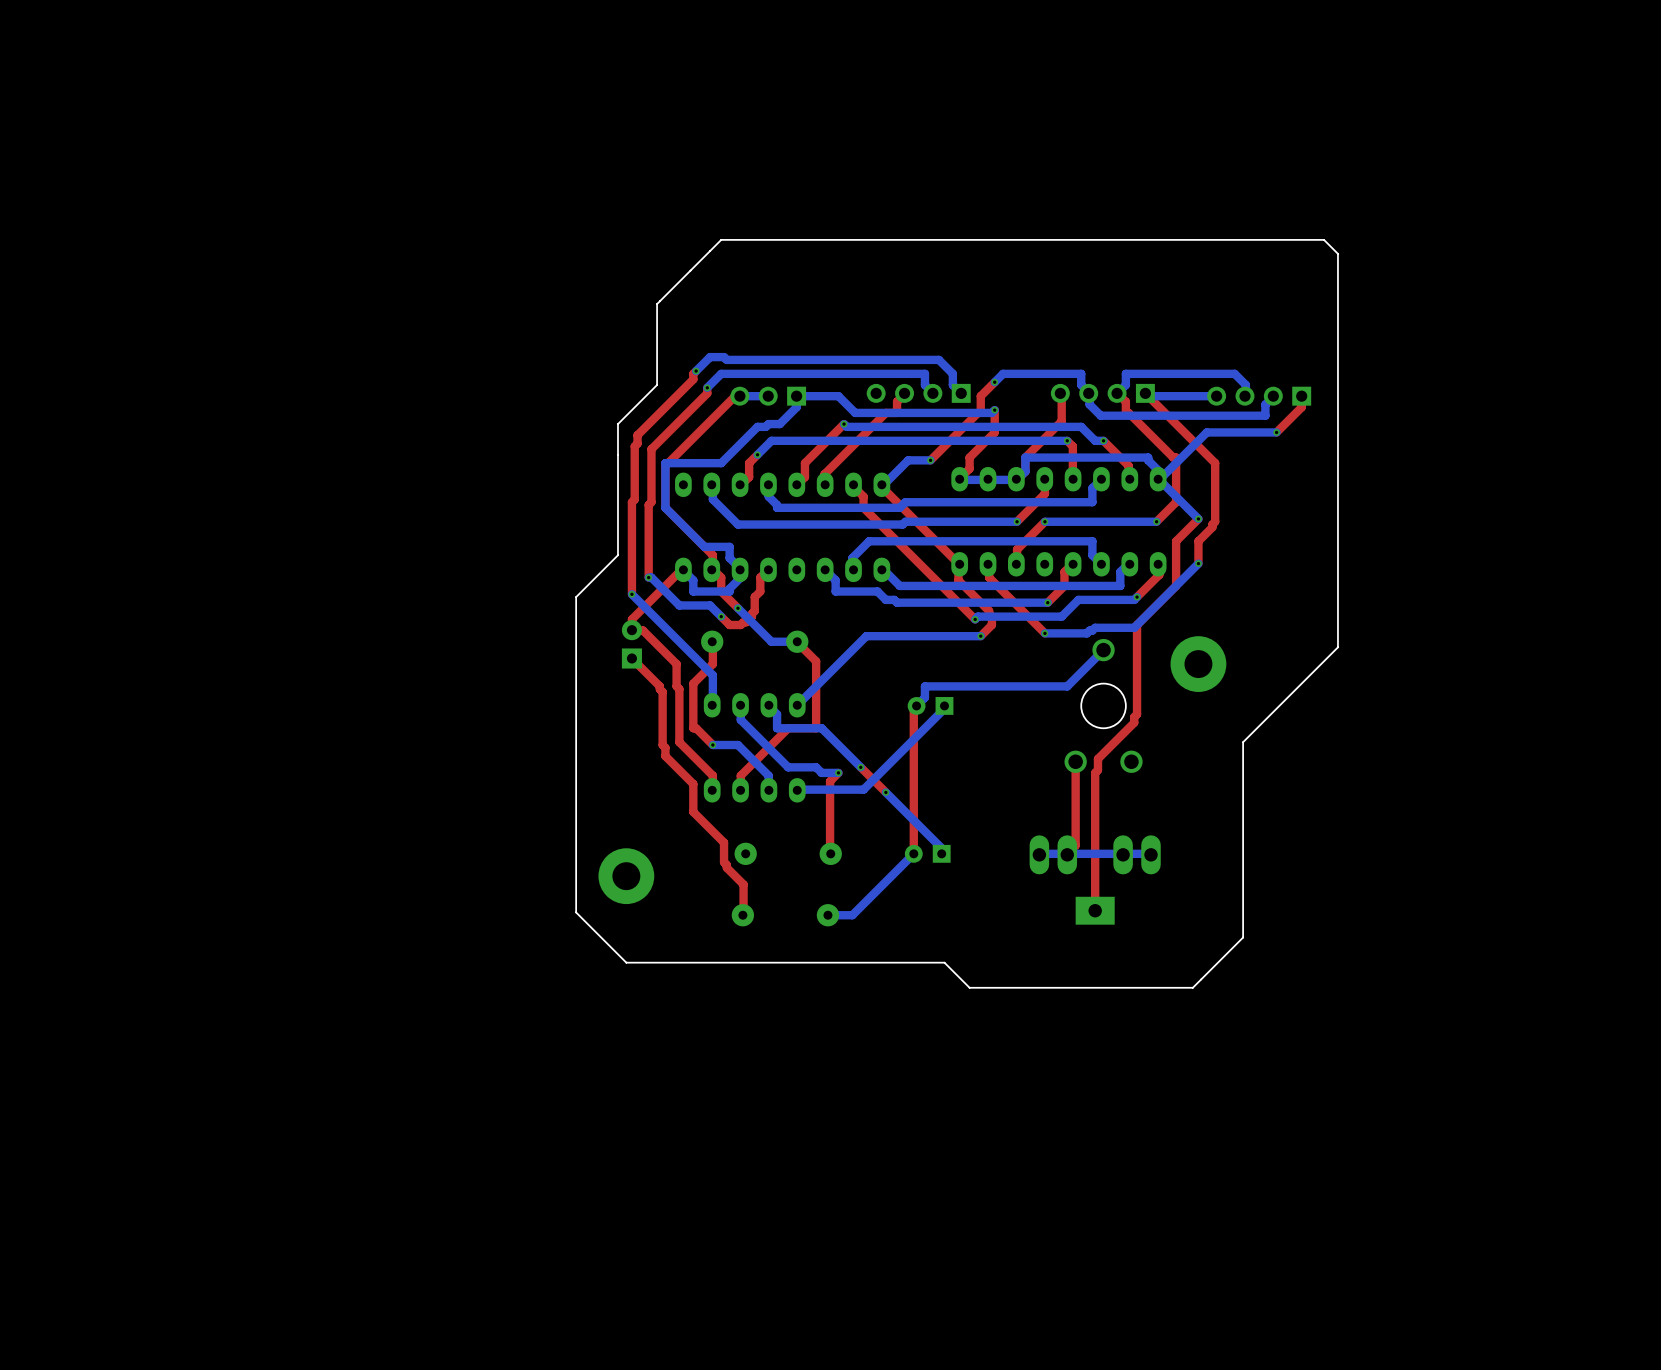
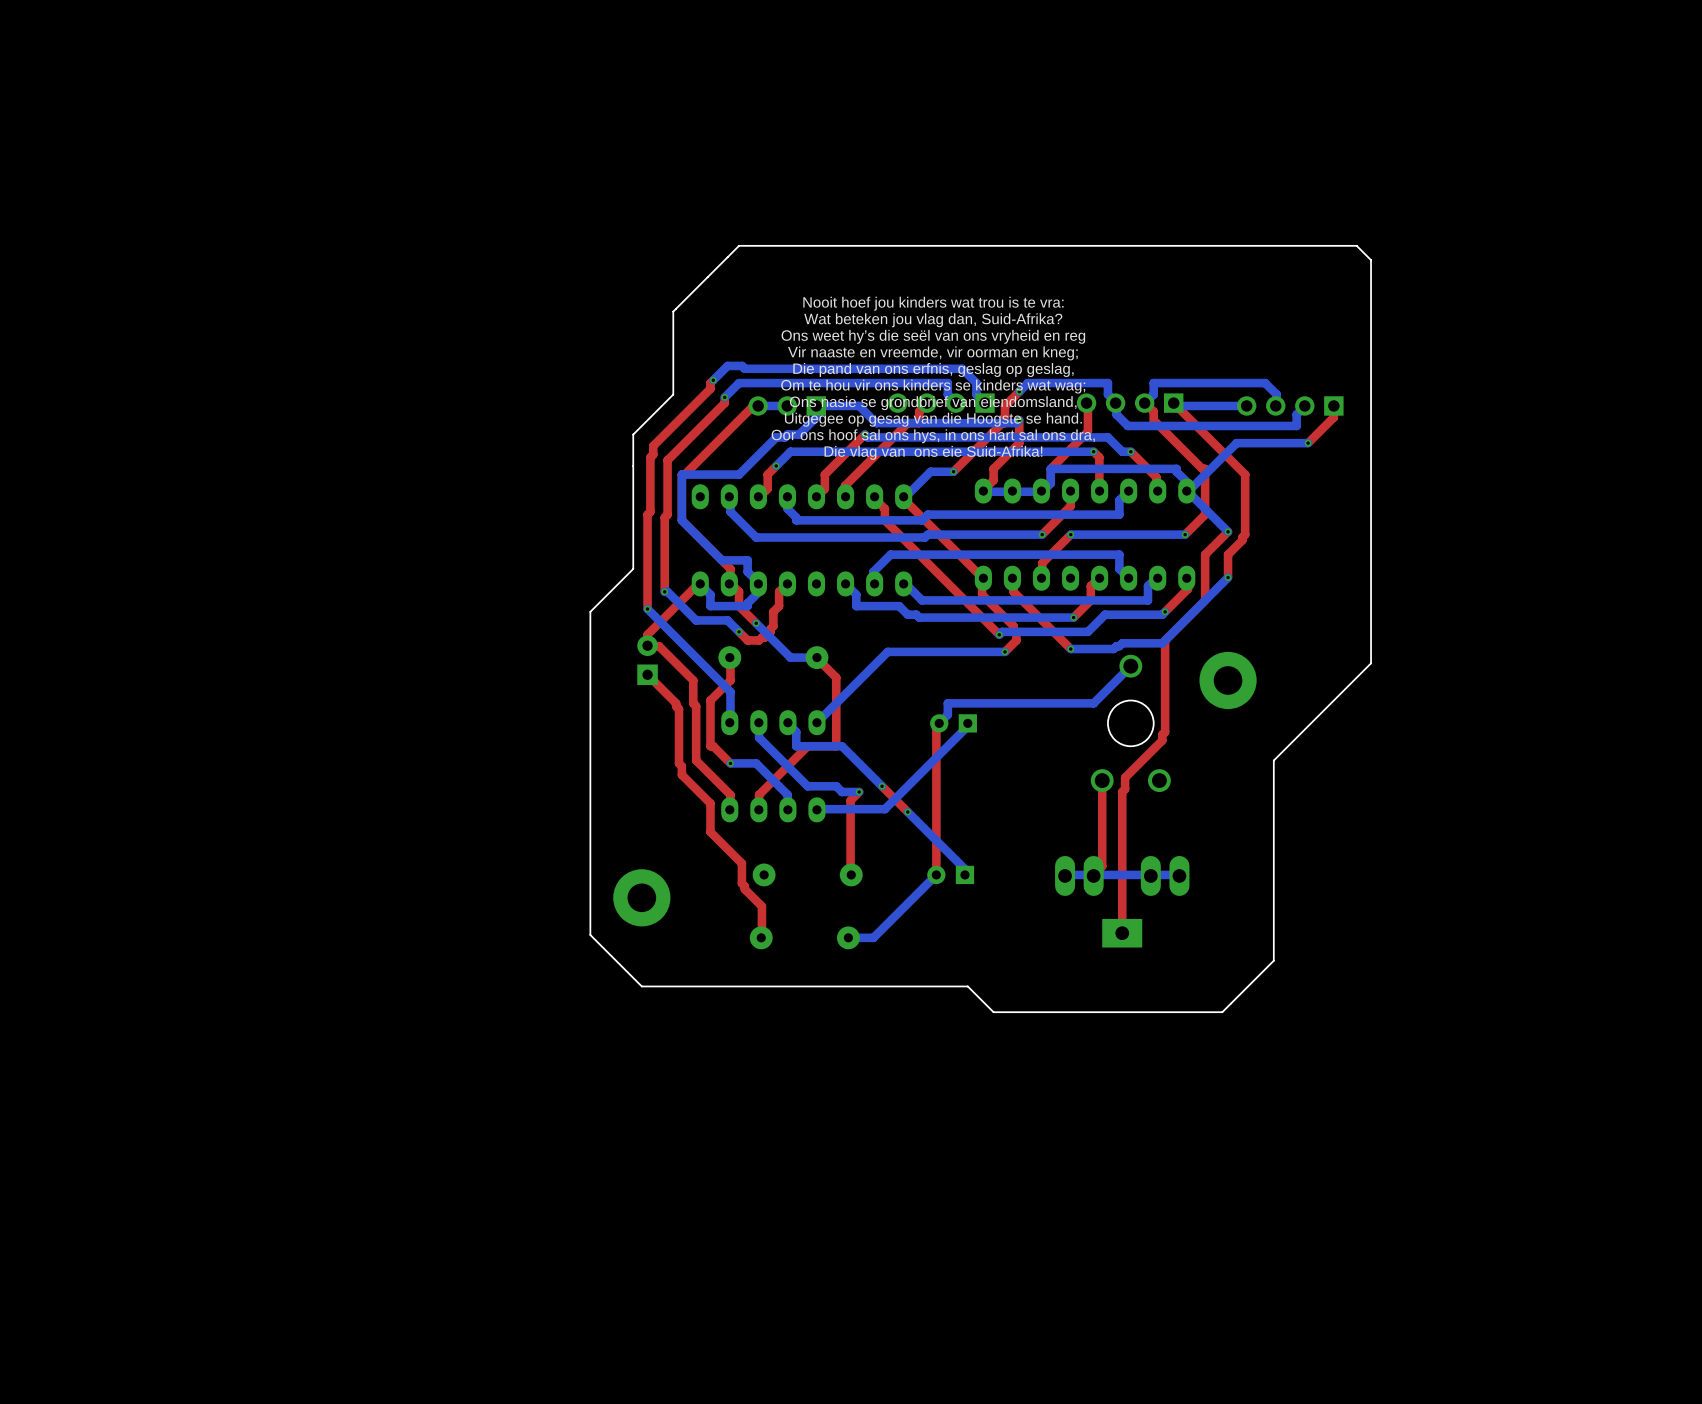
text: none -> Nooit hoef jou kinders wat trou is te vra: (933, 303)
text: none -> Wat beteken jou vlag dan, Suid-Afrika? (933, 320)
text: none -> Ons weet hy’s die seël van ons vryheid en reg (933, 336)
text: none -> Vir naaste en vreemde, vir oorman en kneg; (932, 353)
text: none -> Die pand van ons erfnis, geslag op geslag, (933, 369)
text: none -> Om te hou vir ons kinders se kinders wat wag; (933, 386)
text: none -> Ons nasie se grondbrief van eiendomsland, (933, 403)
text: none -> Uitgegee op gesag van die Hoogste se hand. (933, 419)
text: none -> Oor ons hoof sal ons hys, in ons hart sal ons dra, (933, 436)
text: none -> Die vlag van ons eie Suid-Afrika! (933, 452)

